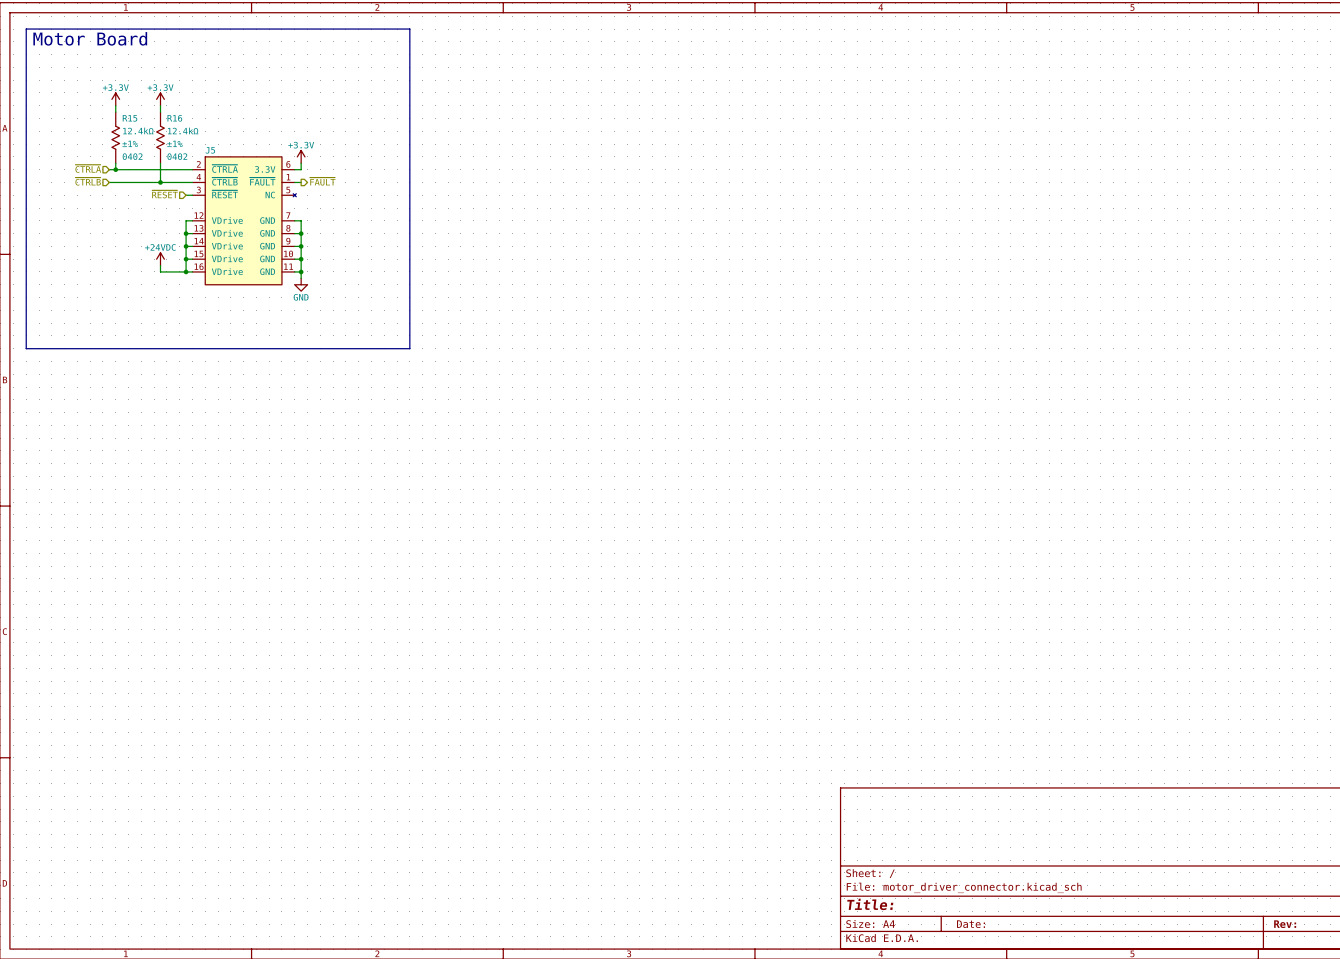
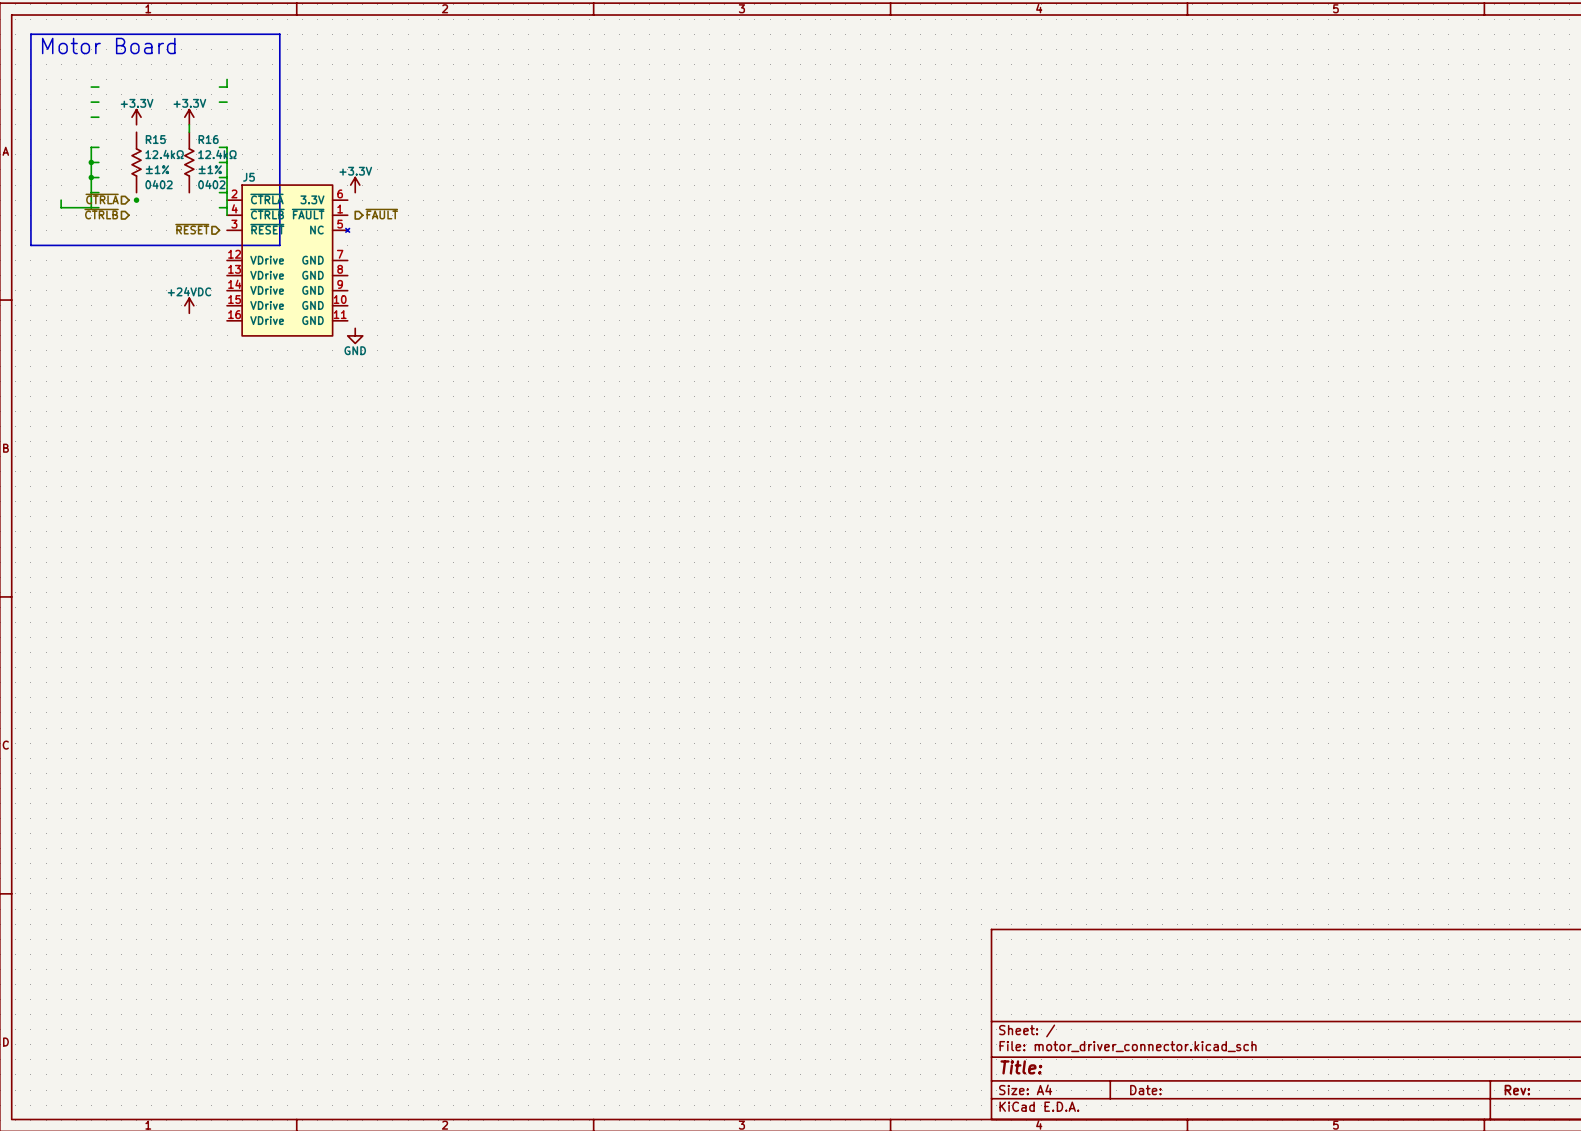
line: (237, 29) (409, 29) (409, 348) (26, 348) (26, 208) -> (279, 34) (279, 245) (30, 245)
wire: none -> (227, 79) (227, 87) (219, 87)
wire: none -> (91, 87) (98, 87)
wire: none -> (91, 102) (98, 102)
wire: none -> (91, 117) (98, 117)
wire: (115, 105) (115, 112) -> none
wire: none -> (98, 147) (91, 147) (91, 207)
wire: none -> (91, 162) (98, 162)
junction: none -> (91, 162)
wire: none -> (91, 177) (98, 177)
junction: none -> (91, 177)
wire: none -> (91, 192) (98, 192)
wire: (115, 163) (115, 169) -> none
wire: (160, 163) (160, 182) -> none
wire: (301, 163) (301, 169) (294, 169) -> none
wire: none -> (61, 200) (61, 207) (98, 207)
wire: (109, 169) (192, 169) -> none
wire: (109, 182) (192, 182) -> (219, 147) (227, 147) (227, 215)
junction: (160, 182) -> none
wire: (294, 182) (301, 182) -> (219, 162) (227, 162)
wire: (186, 195) (192, 195) -> (219, 102) (227, 102)
wire: (192, 220) (186, 220) (186, 271) -> none
wire: (294, 220) (301, 220) (301, 278) -> none
wire: (186, 233) (192, 233) -> (219, 177) (227, 177)
junction: (186, 233) -> none
wire: (294, 233) (301, 233) -> none
junction: (301, 233) -> none
wire: (186, 246) (192, 246) -> (219, 192) (227, 192)
junction: (186, 246) -> none
wire: (294, 246) (301, 246) -> none
junction: (301, 246) -> none
wire: (186, 259) (192, 259) -> (219, 207) (227, 207)
junction: (186, 259) -> none
wire: (294, 259) (301, 259) -> none
junction: (301, 259) -> none
wire: (160, 265) (160, 271) (192, 271) -> none
junction: (186, 271) -> none
wire: (294, 271) (301, 271) -> none
junction: (301, 271) -> none

